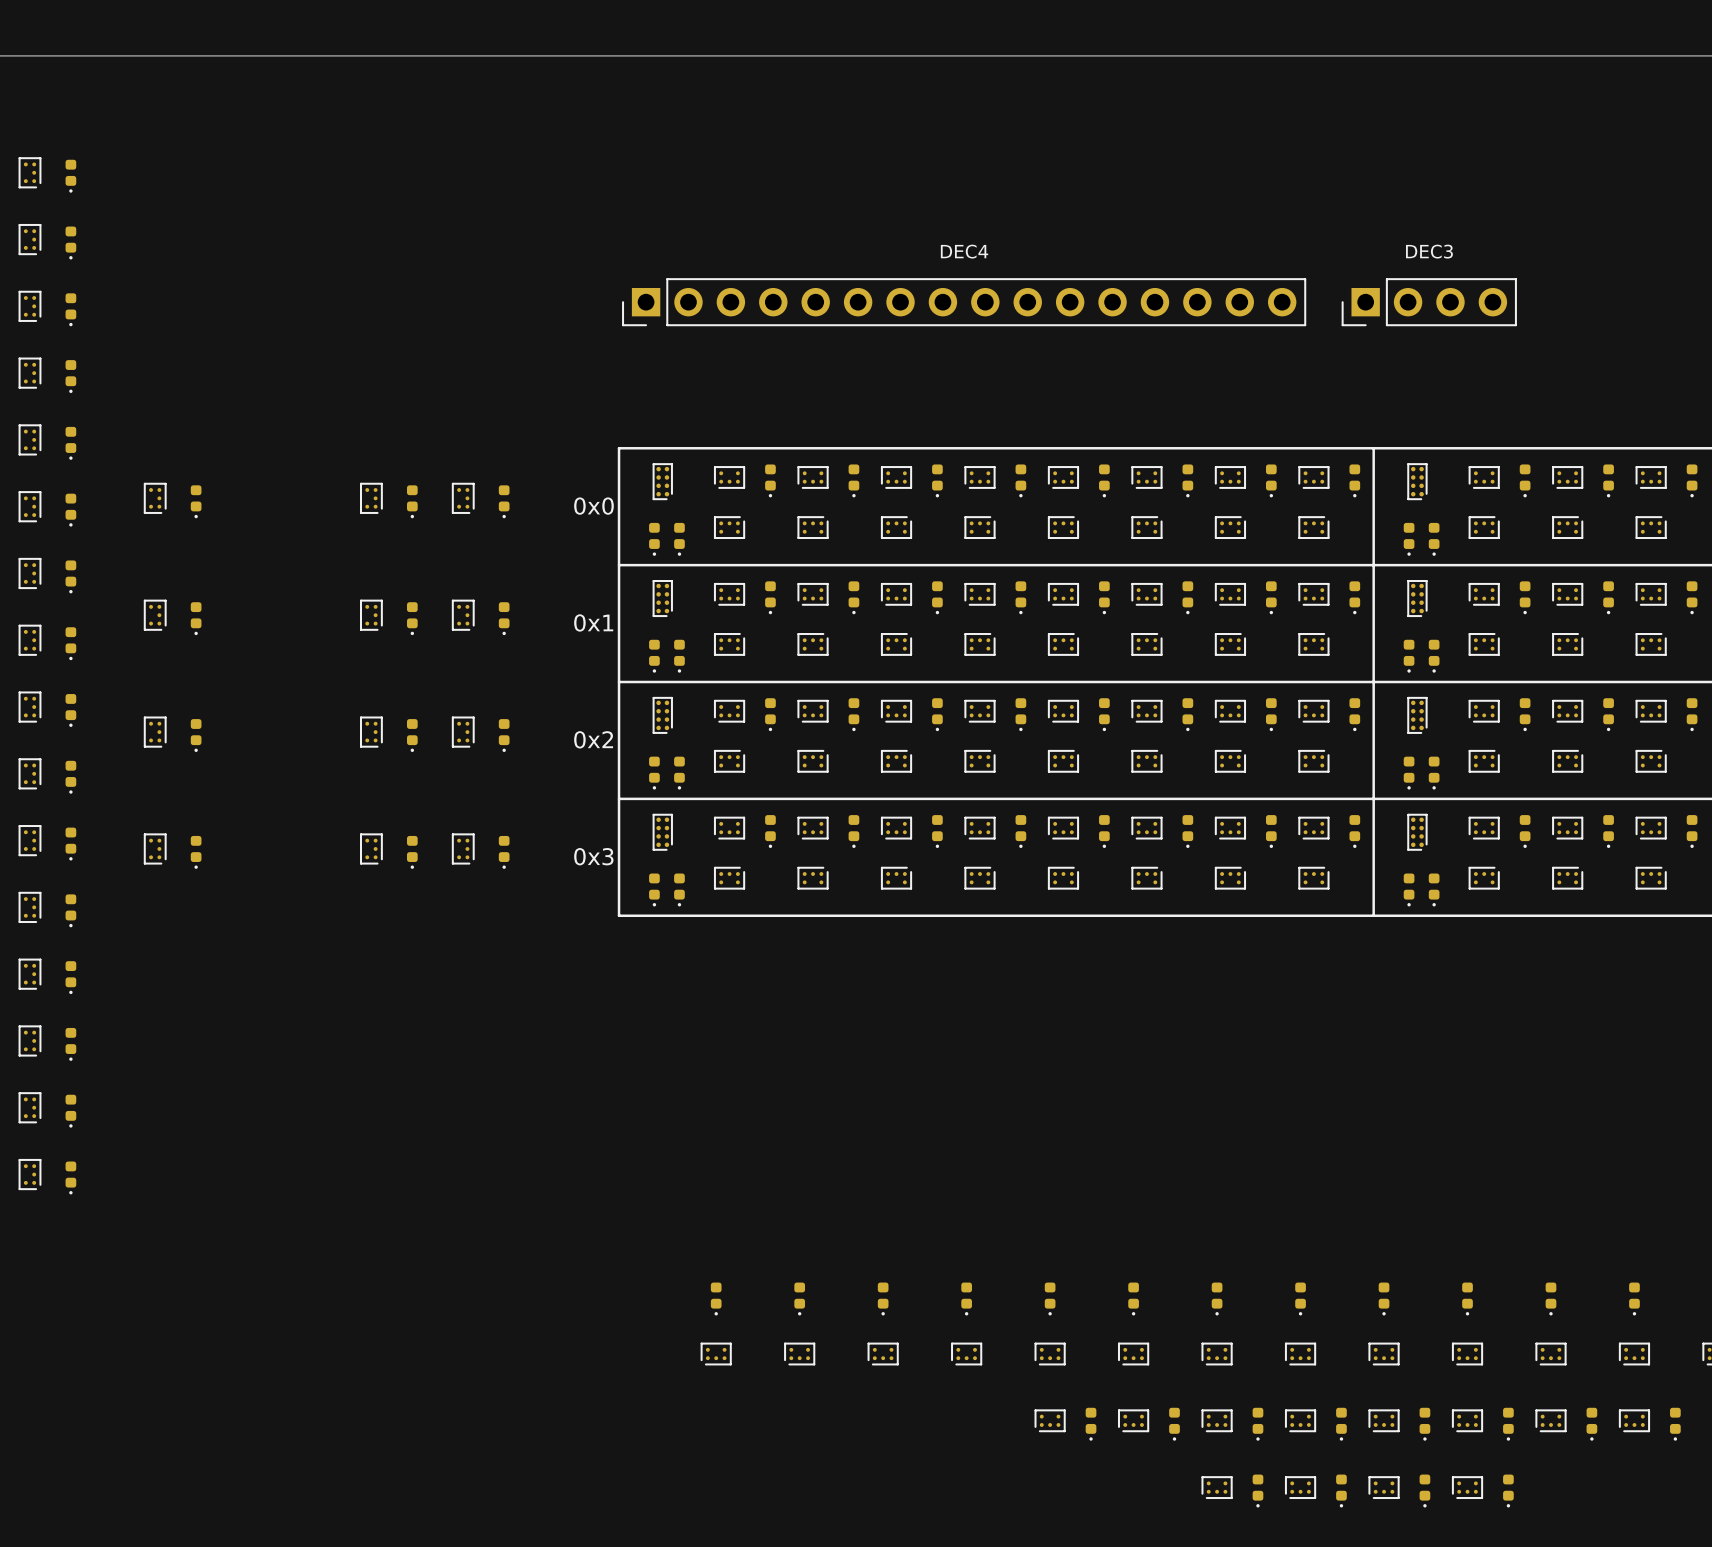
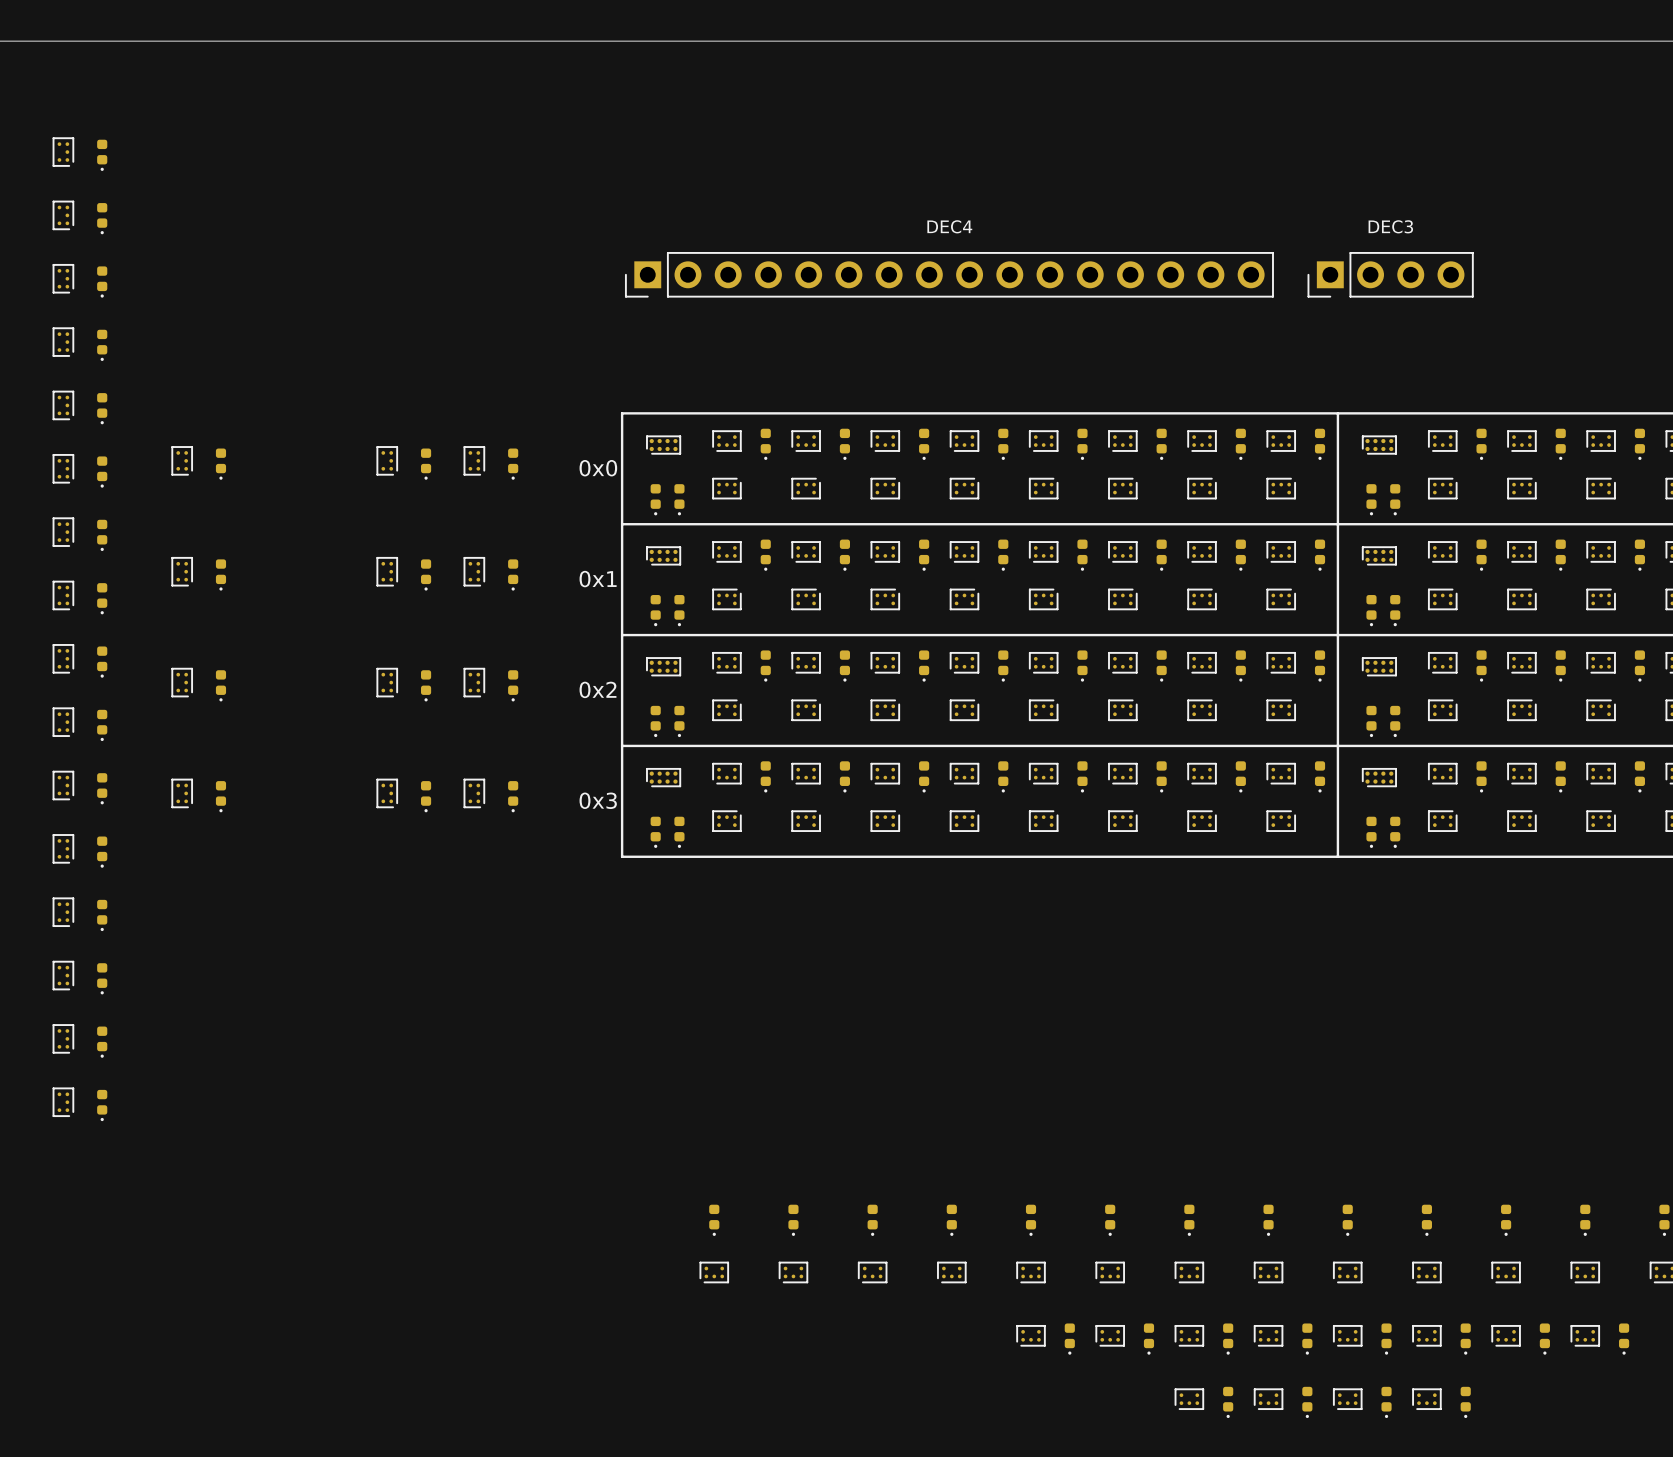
part rotation: 0° (662, 481) -> 90° clockwise (663, 445)
part rotation: 0° (1417, 481) -> 90° clockwise (1379, 445)
part rotation: 0° (662, 598) -> 90° clockwise (663, 555)
part rotation: 0° (1417, 598) -> 90° clockwise (1379, 555)
part rotation: 0° (662, 715) -> 90° clockwise (663, 666)
part rotation: 0° (1417, 715) -> 90° clockwise (1379, 666)
part rotation: 0° (662, 832) -> 90° clockwise (663, 777)
part rotation: 0° (1417, 832) -> 90° clockwise (1379, 777)

